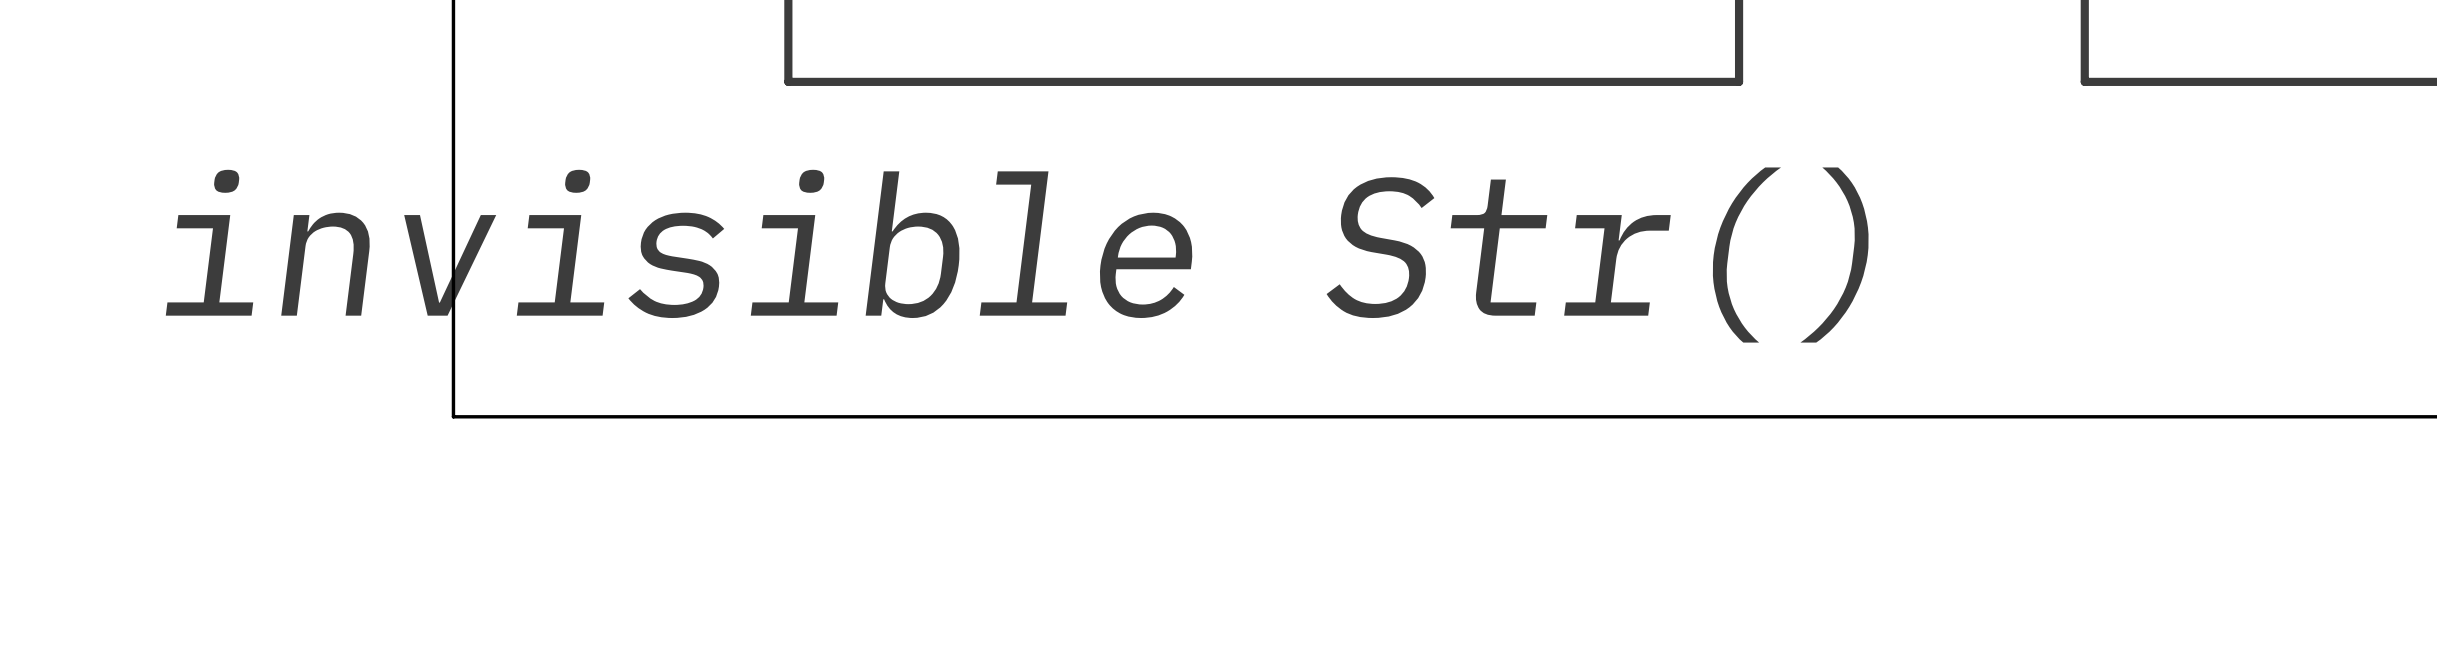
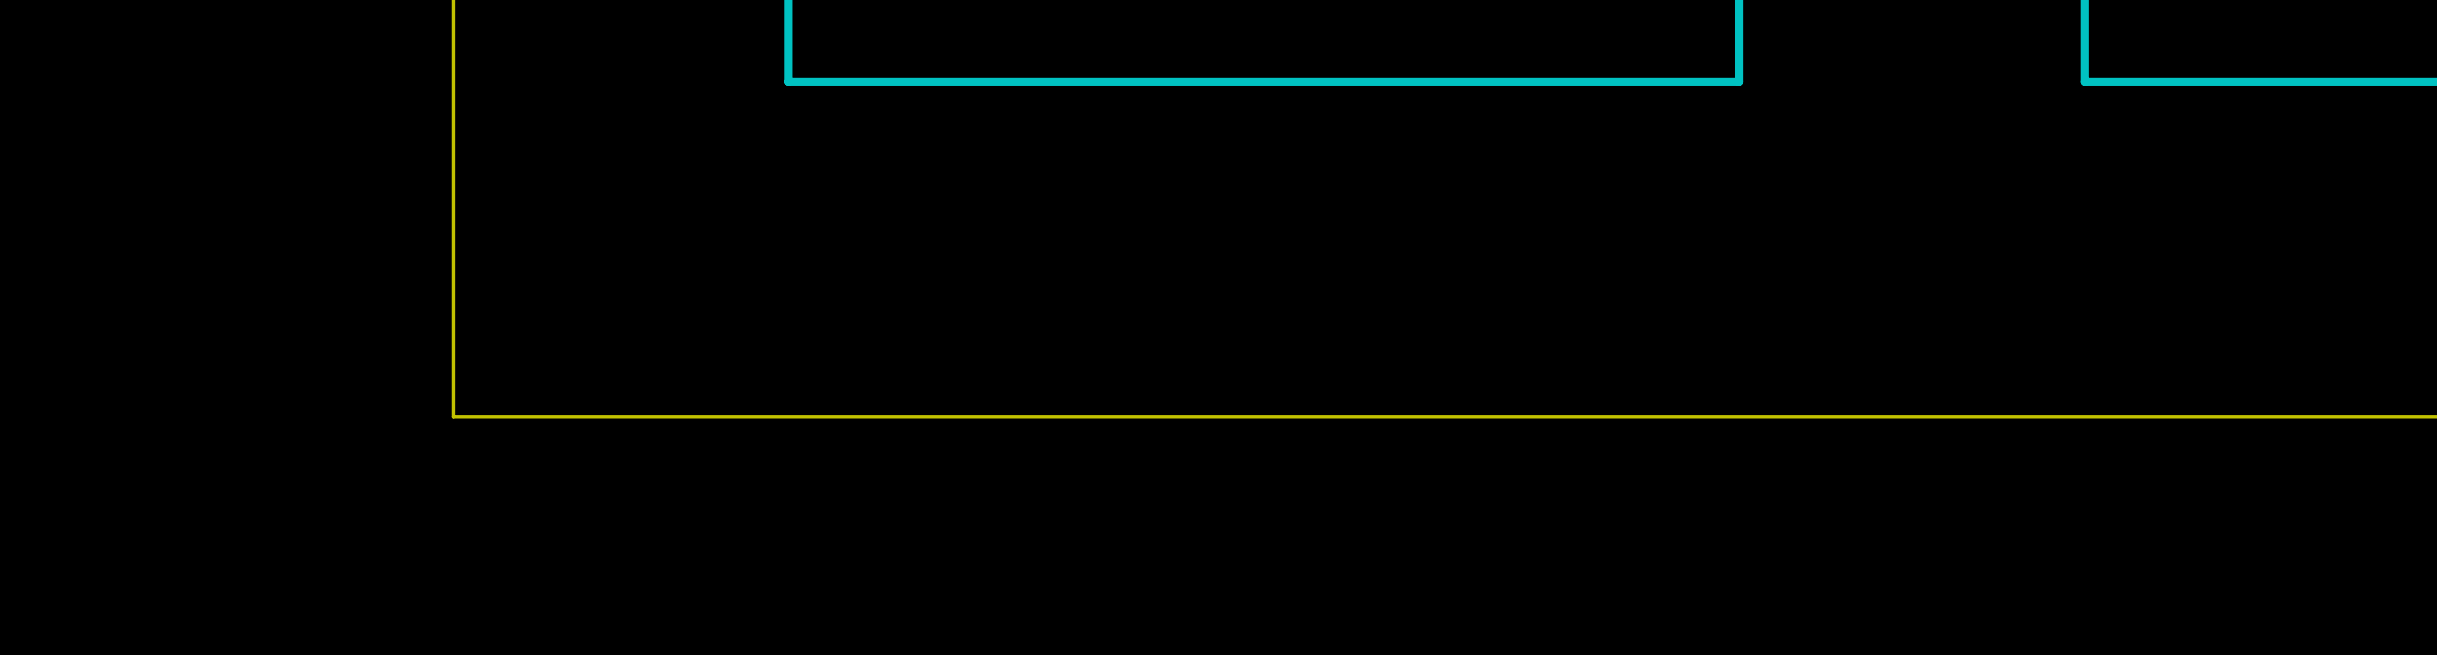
text: invisible Str() (1017, 255) -> none

